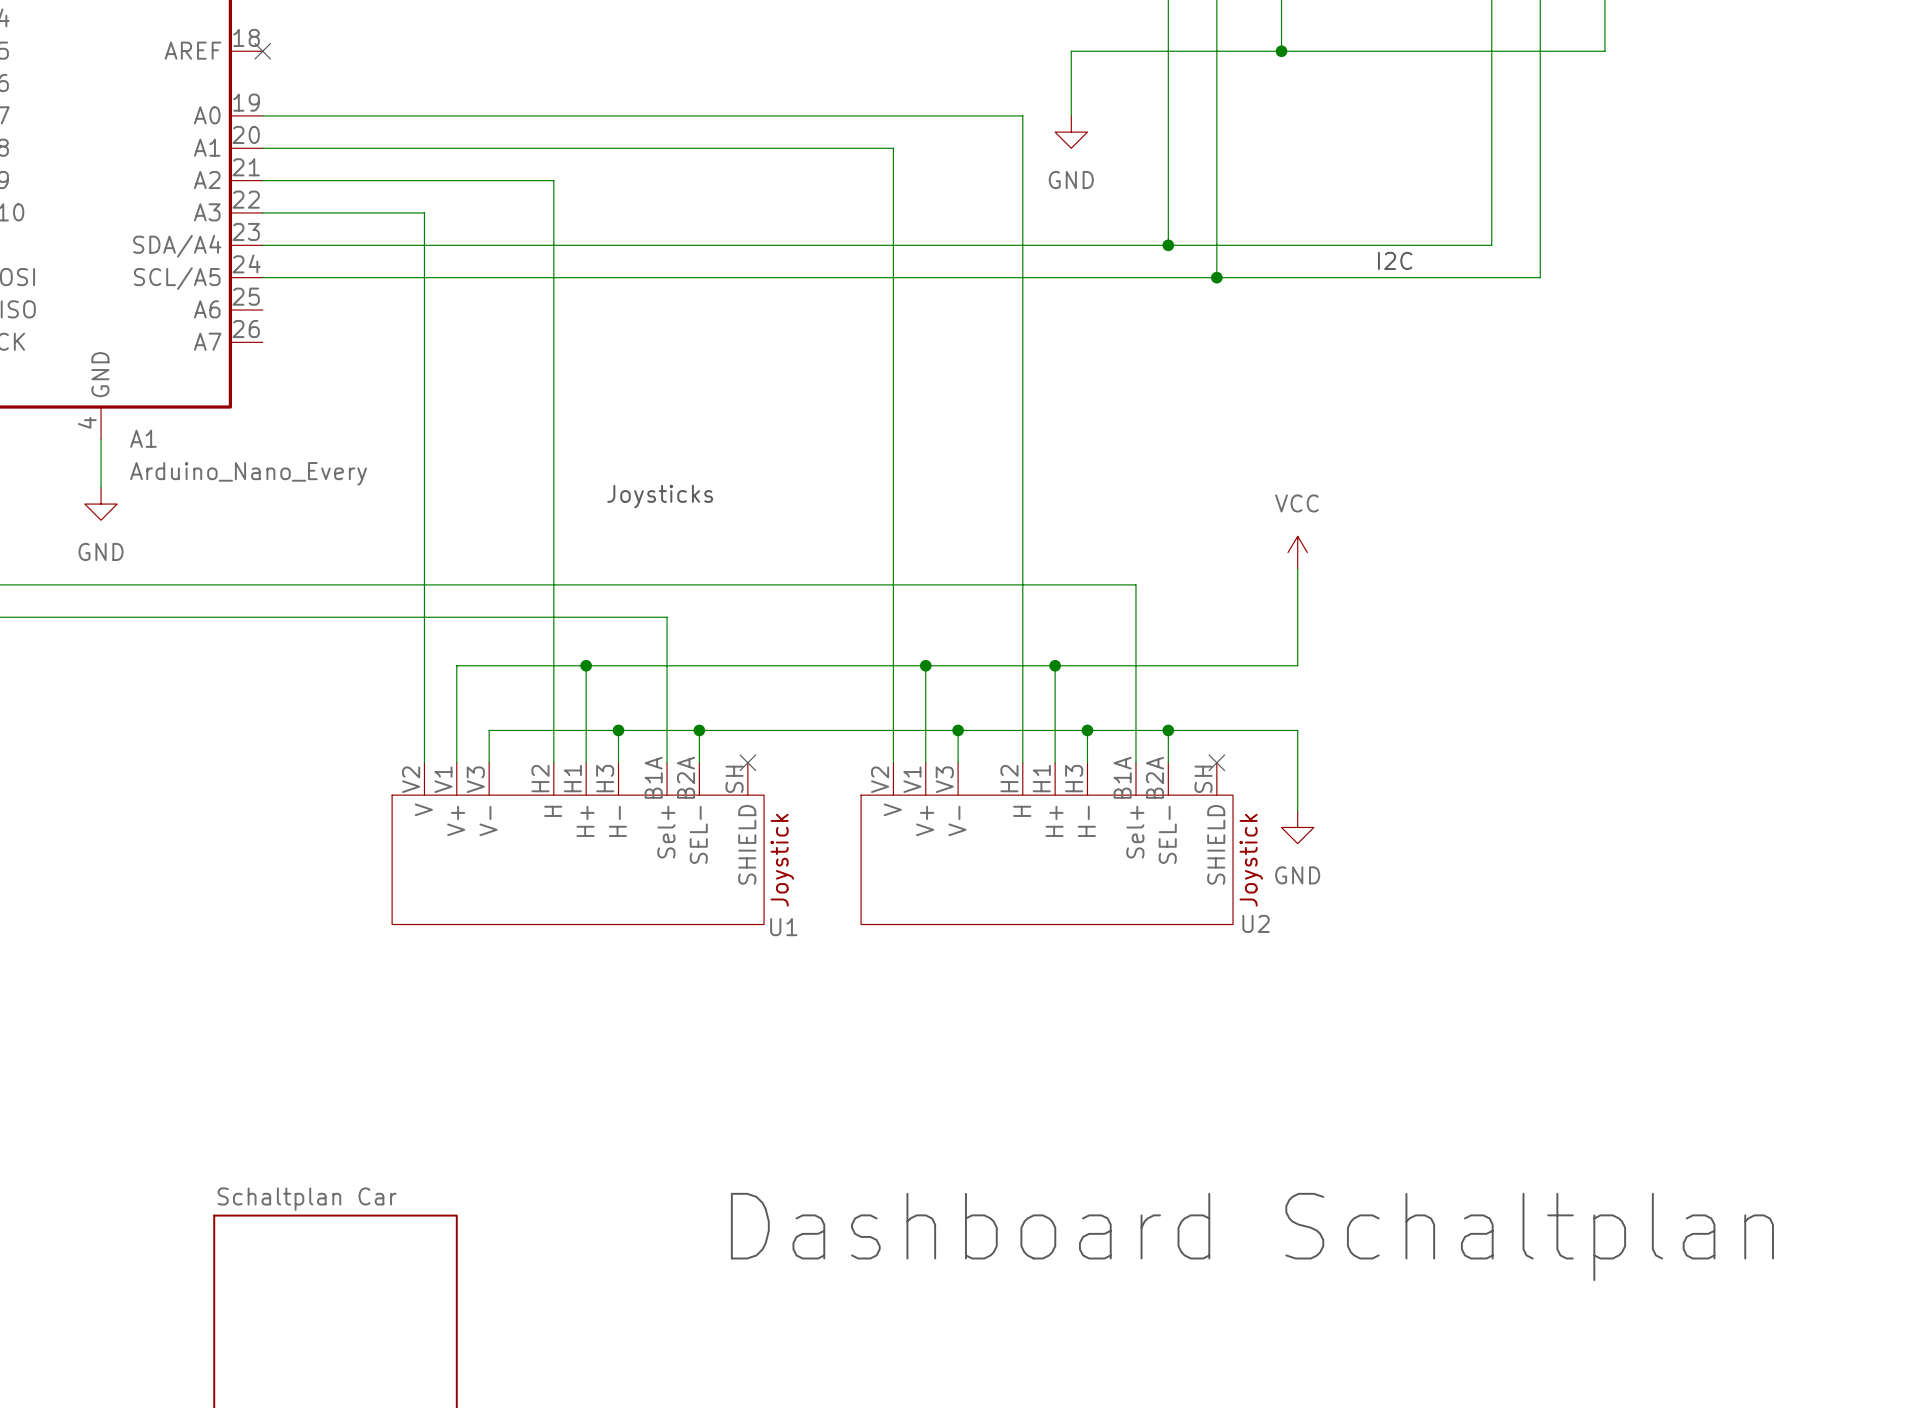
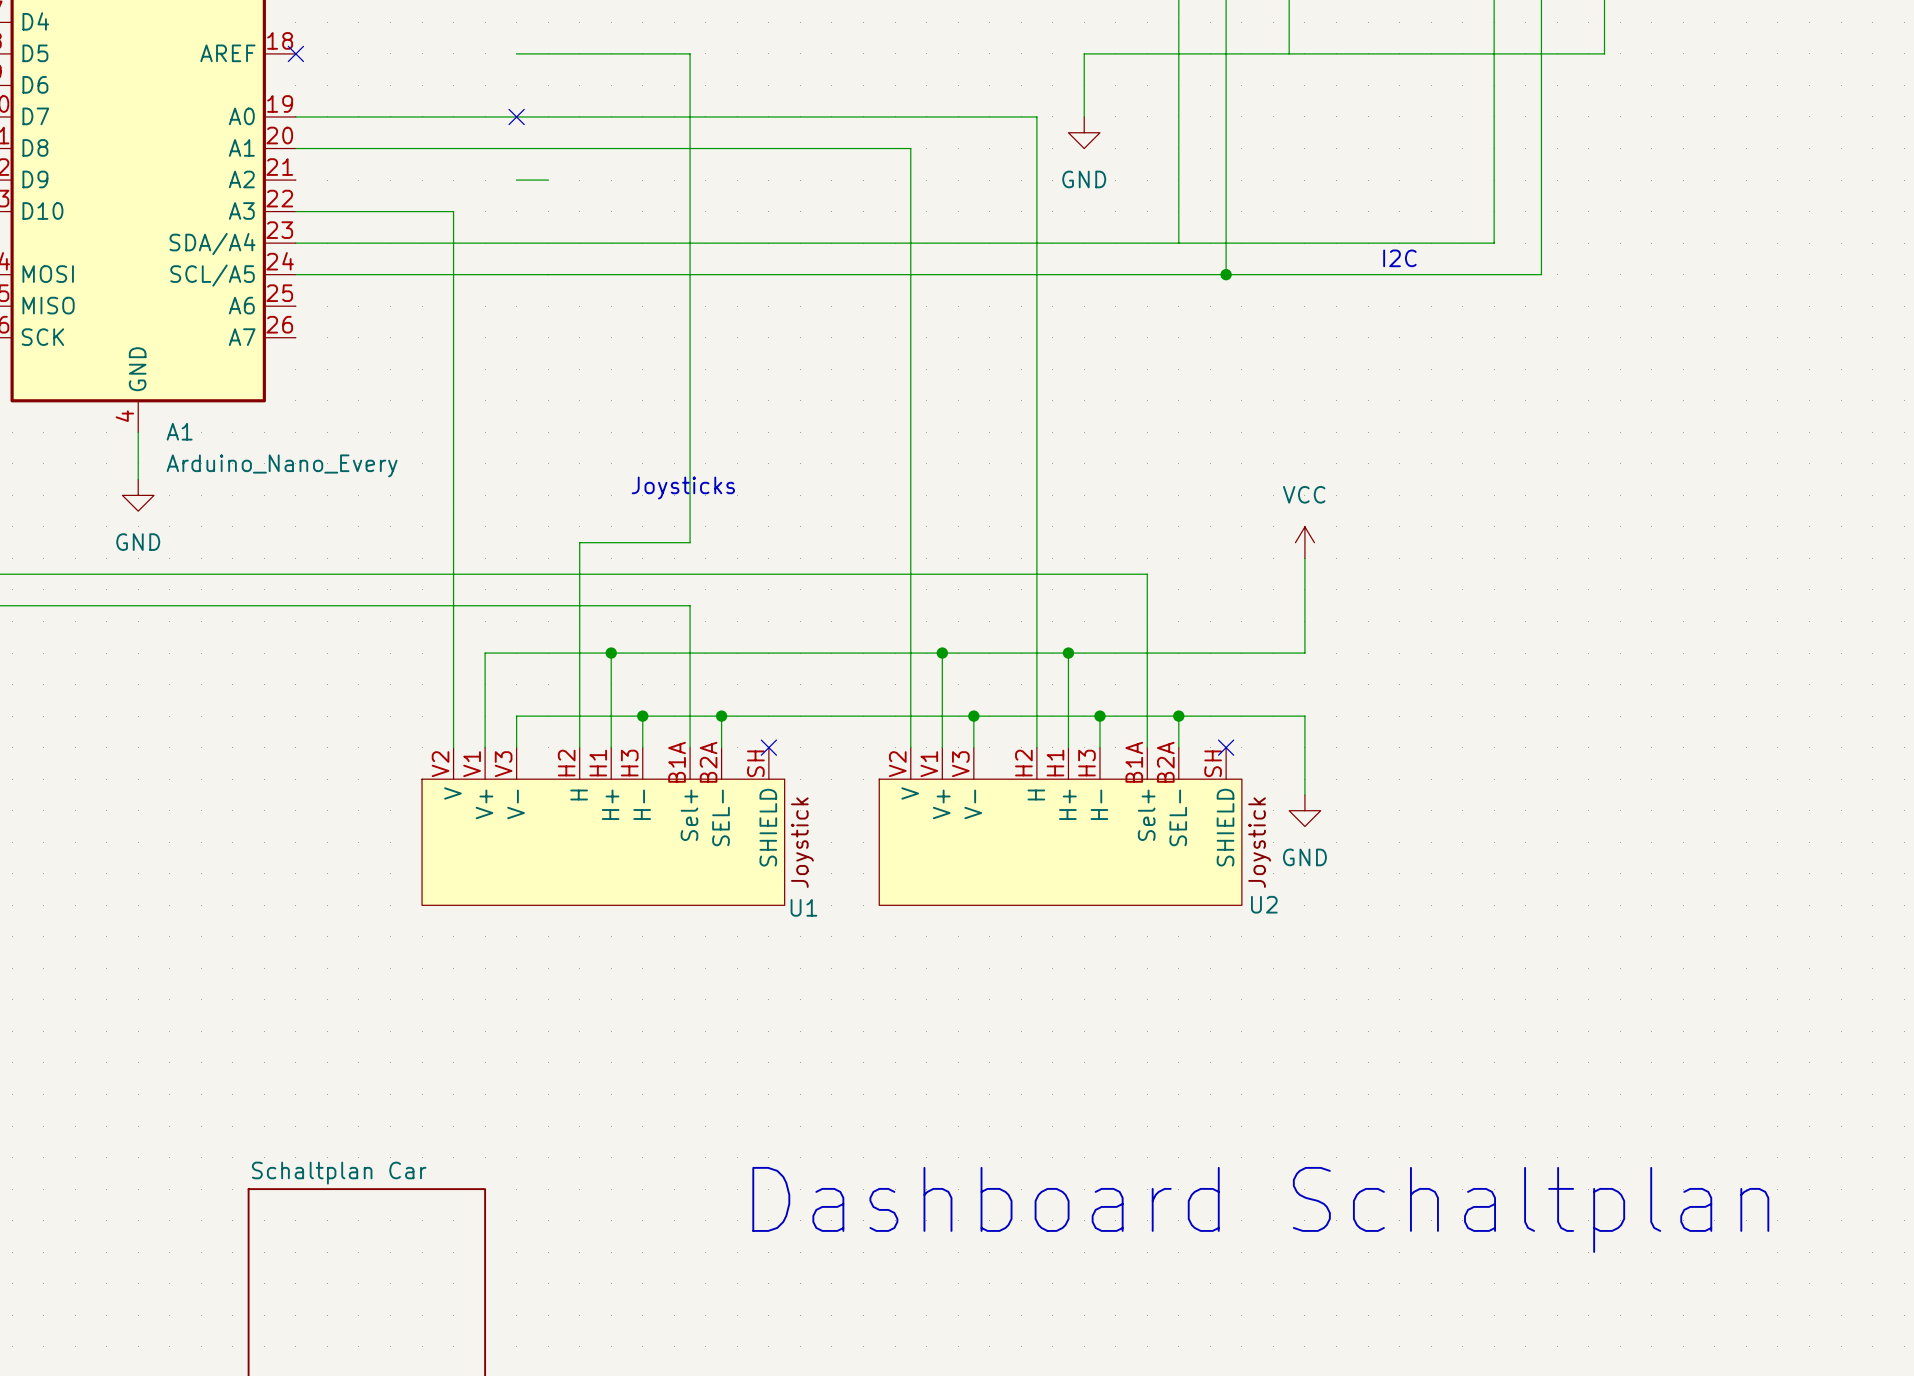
junction: (1281, 51) -> none
no-connect mark: none -> (516, 116)
wire: (262, 180) (489, 180) -> none
wire: (521, 180) (553, 180) (553, 552) -> (516, 53) (690, 53) (690, 542) (579, 542)
junction: (1168, 245) -> none

